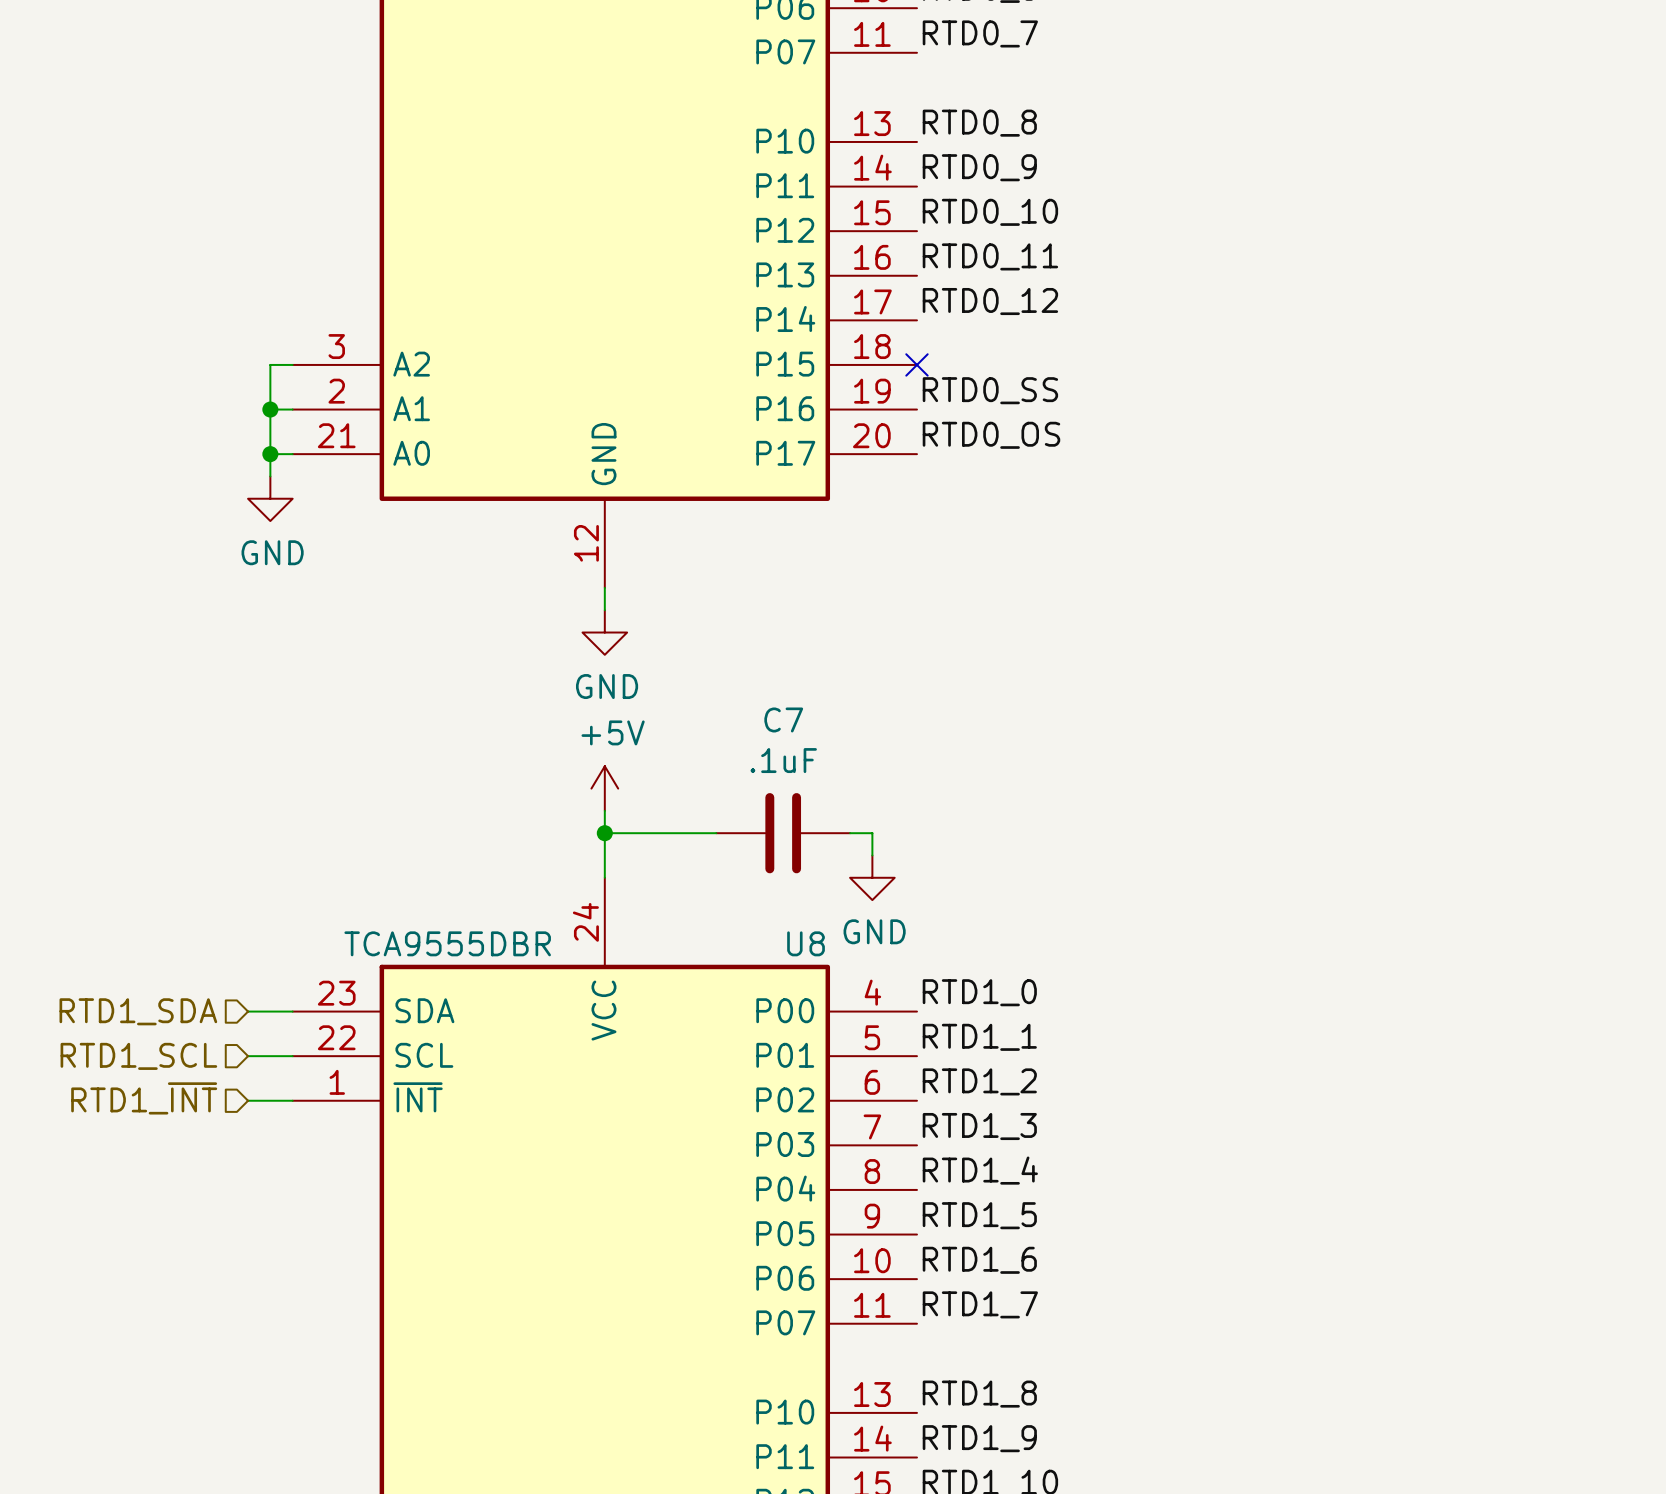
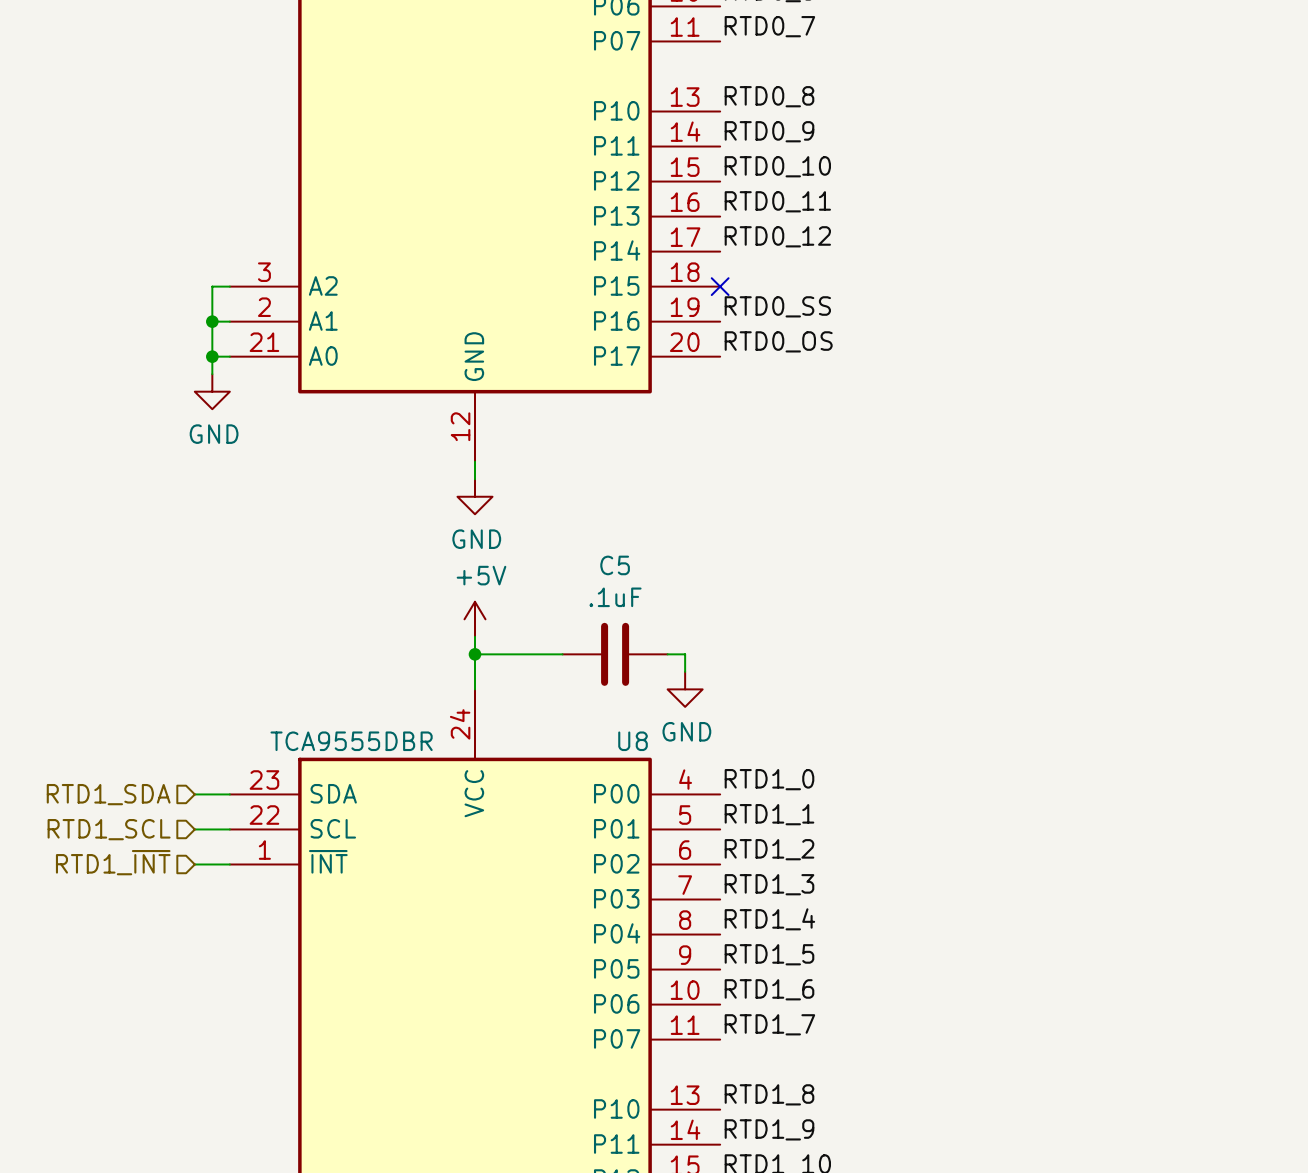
C7 name: C7 (783, 719) -> C5 (615, 565)

